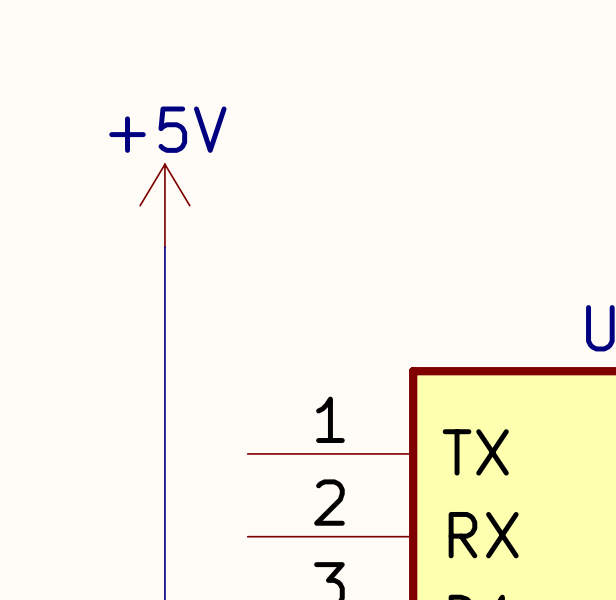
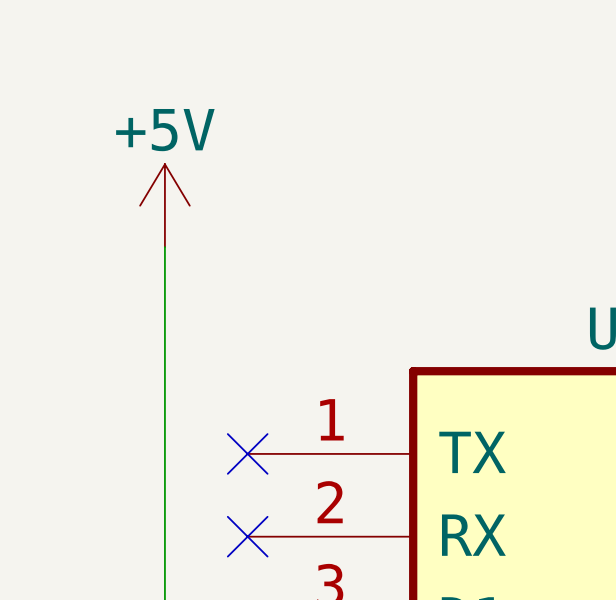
no-connect mark: none -> (247, 453)
no-connect mark: none -> (247, 536)

